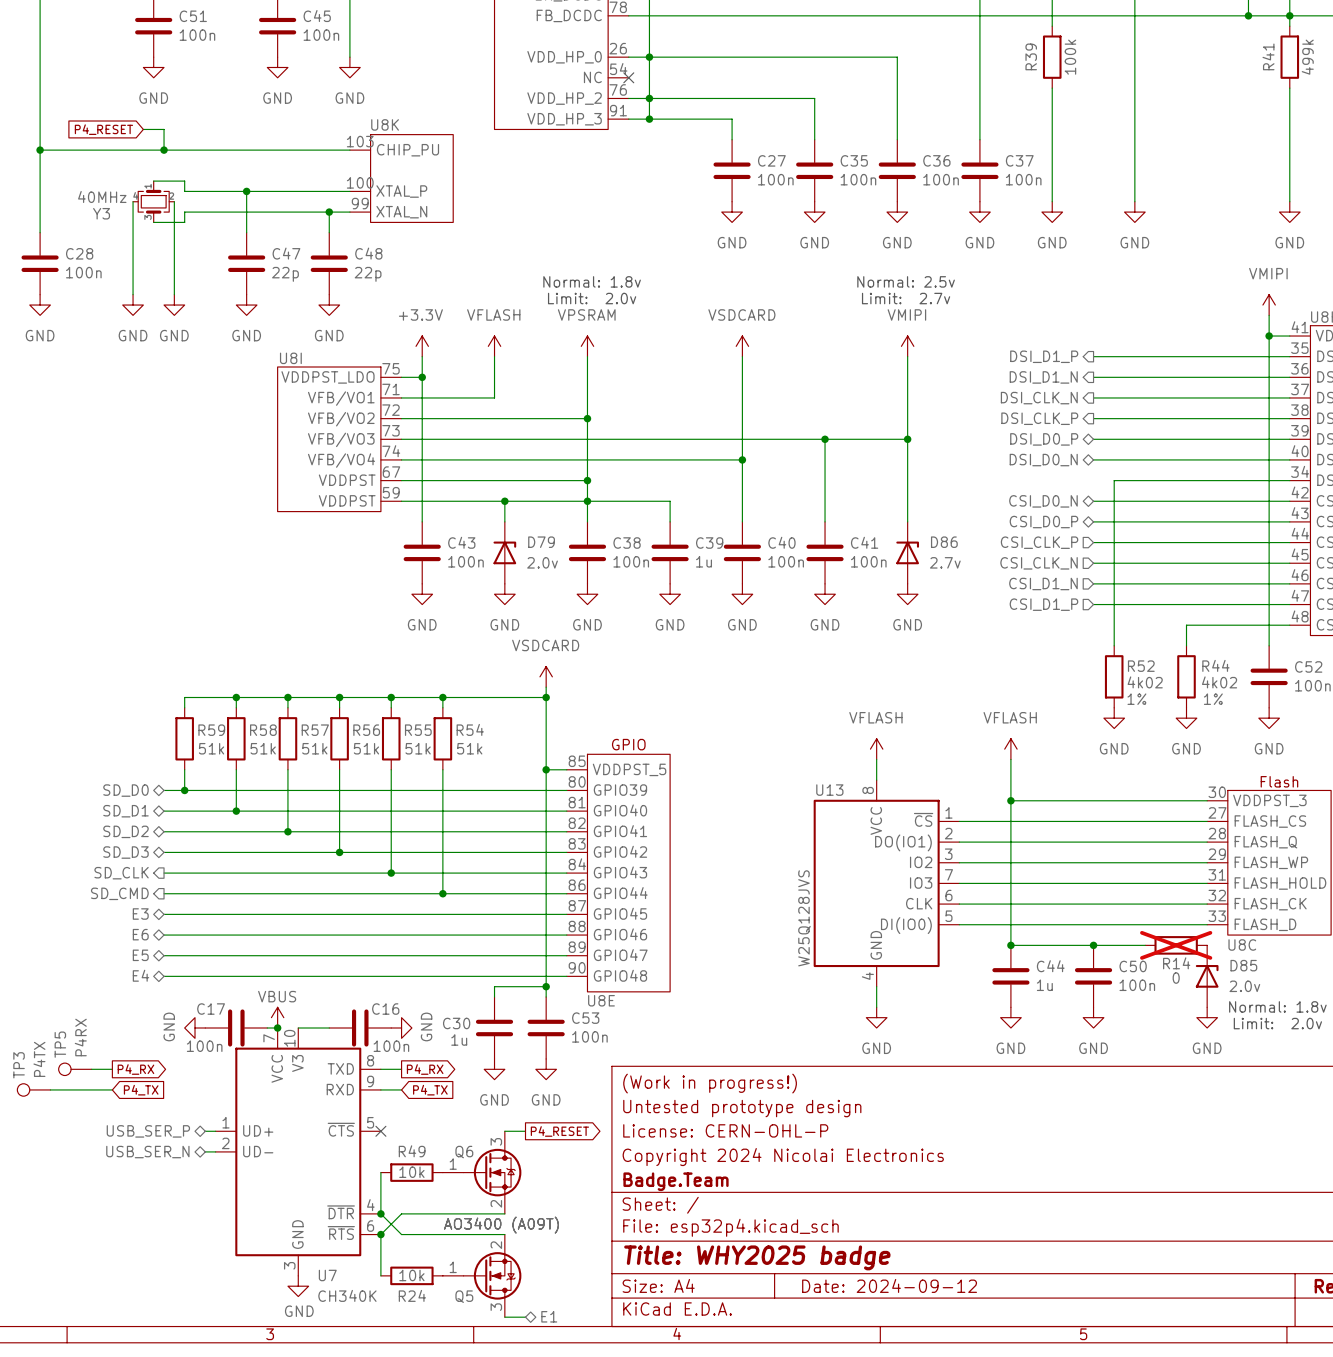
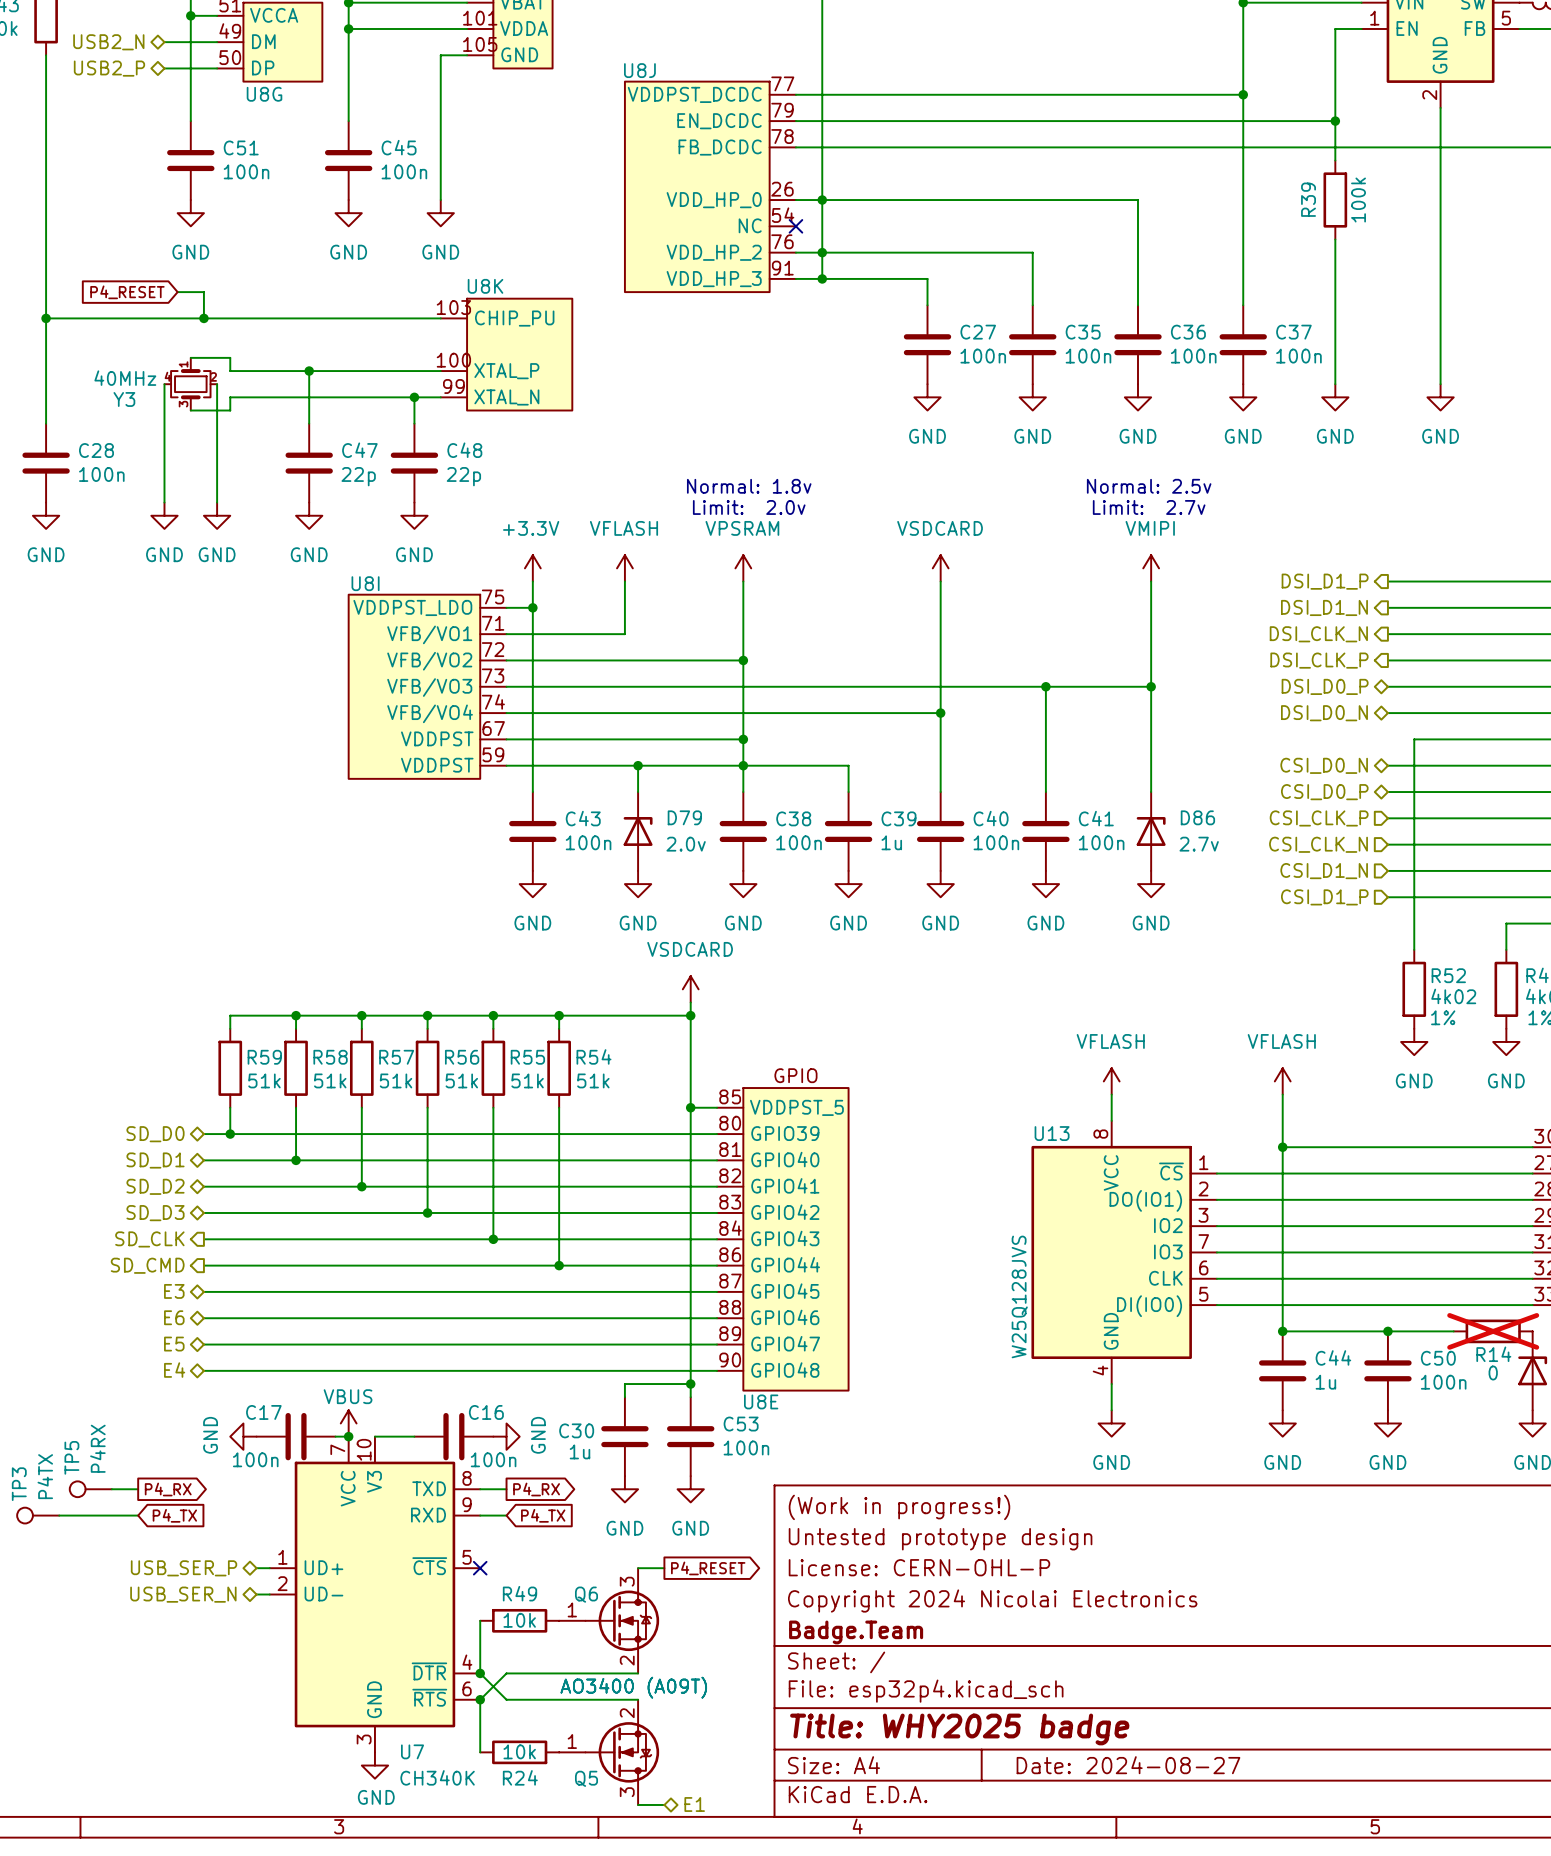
title block: Date: 2024-09-12 (889, 1285) -> Date: 2024-08-27 (1128, 1765)

